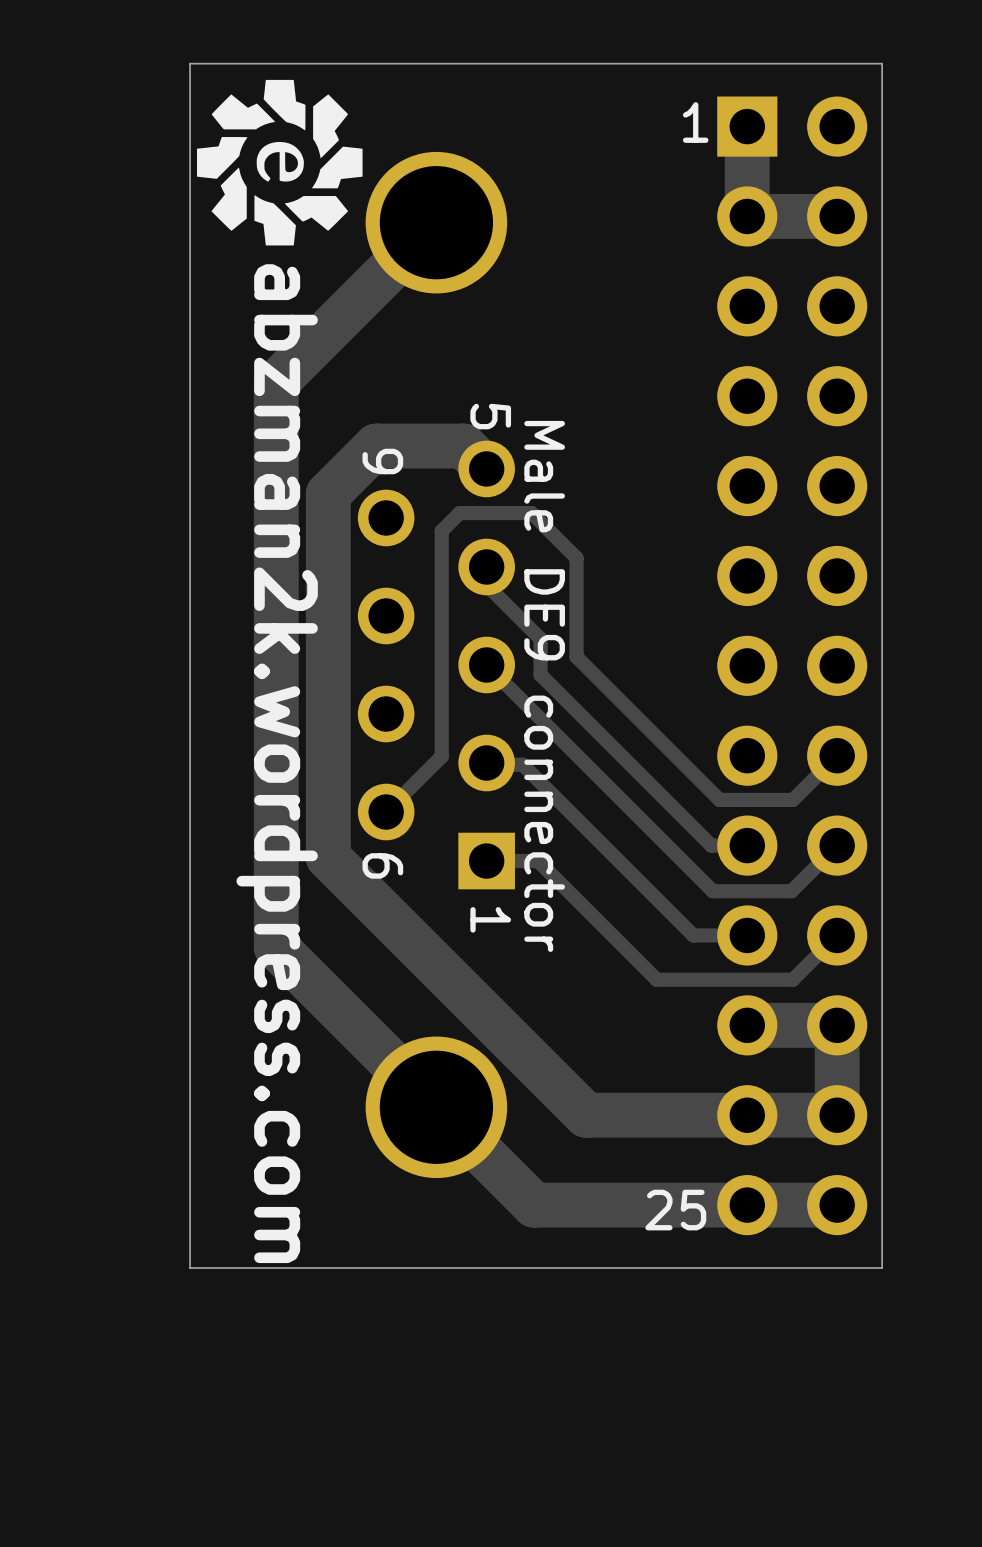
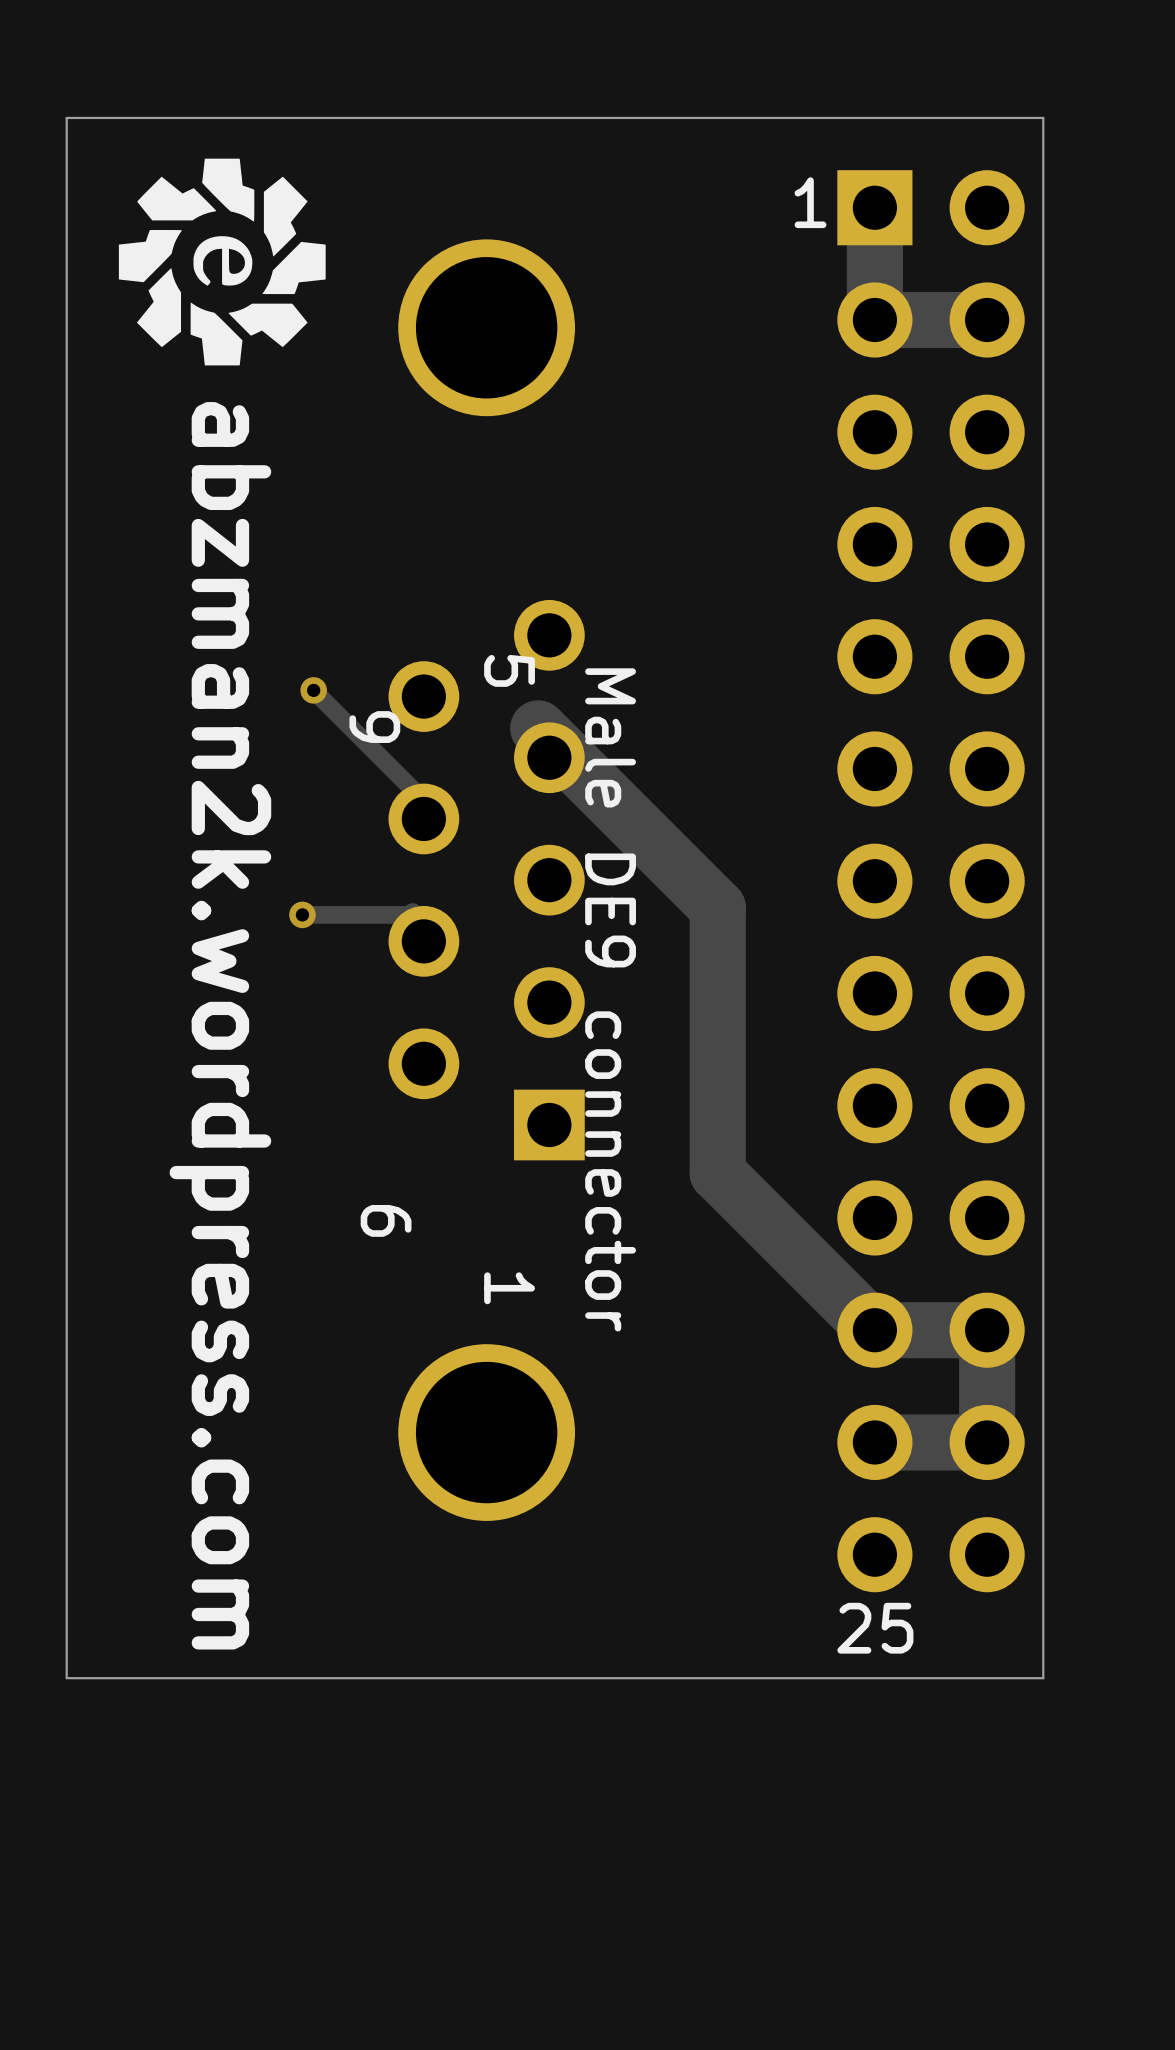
board edge: (882, 63) (190, 63) (190, 1268) (882, 1268) -> (1043, 129) (1043, 117) (66, 117) (66, 1678) (1043, 1678) (1043, 1633)
drawing position: (279, 162) -> (222, 262)
track: (436, 222) (276, 382) (276, 947) (534, 1205) (837, 1205) -> none
text position: 5 (490, 416) -> 5 (509, 670)
text position: 9 (382, 461) -> 9 (374, 727)
track: (486, 468) (463, 446) (376, 446) (328, 494) (328, 857) (586, 1115) (747, 1115) -> none
track: none -> (313, 690) (412, 789)
via: none -> (313, 690)
track: none -> (538, 728) (717, 907) (717, 1173) (874, 1330)
track: (486, 566) (486, 584) (540, 638) (540, 674) (711, 845) (747, 845) -> none
track: (486, 664) (712, 891) (791, 891) (837, 845) -> none
text position: Male DE9 connector (544, 686) -> Male DE9 connector (610, 999)
track: none -> (412, 911) (409, 914) (302, 914)
via: none -> (302, 914)
track: (837, 755) (792, 799) (719, 799) (576, 656) (576, 557) (531, 513) (459, 513) (441, 531) (441, 756) (386, 812) -> none
text position: abzman2k.wordpress.com (277, 763) -> abzman2k.wordpress.com (220, 1025)
track: (486, 763) (488, 764) (522, 764) (693, 935) (747, 935) -> none
track: (486, 861) (538, 861) (656, 979) (792, 979) (837, 935) -> none
text position: 6 (382, 865) -> 6 (386, 1220)
text position: 1 (490, 919) -> 1 (509, 1288)
text position: 25 (675, 1210) -> 25 (875, 1628)

